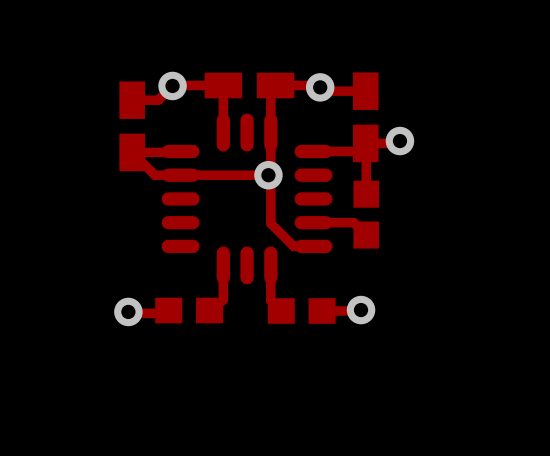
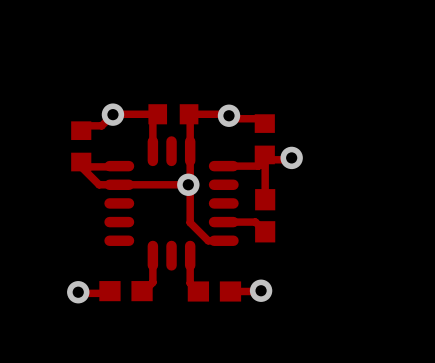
part footprint: [204, 72, 295, 99] -> [148, 104, 199, 125]
part footprint: [352, 72, 379, 163] -> [254, 114, 275, 165]
part footprint: [119, 81, 146, 172] -> [71, 121, 92, 172]

